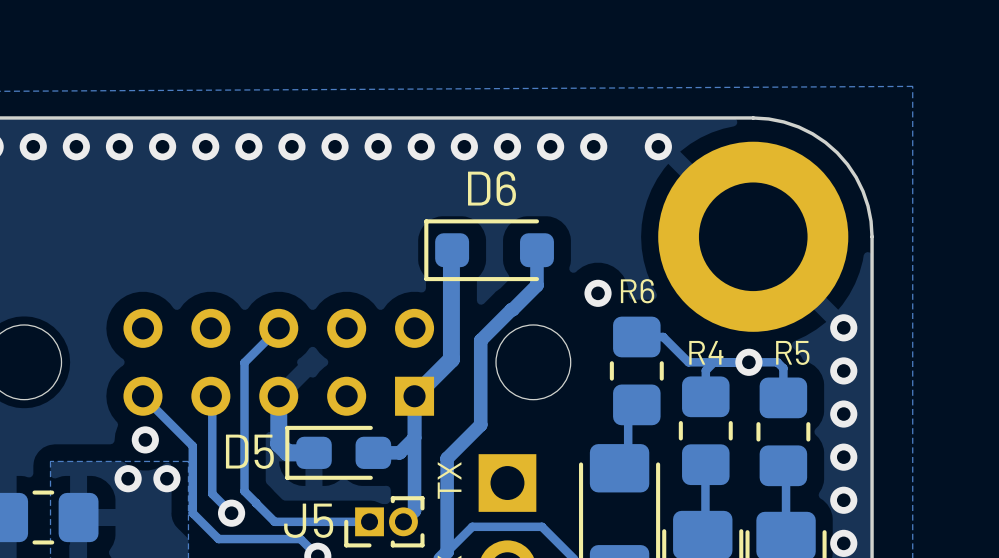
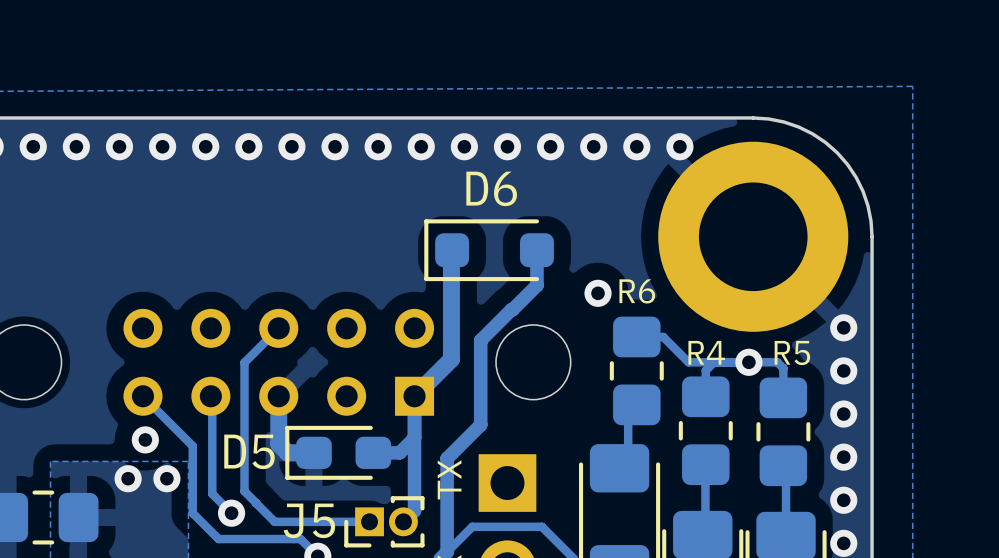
via: none -> (636, 146)
via: (658, 146) -> none
via: none -> (679, 146)

